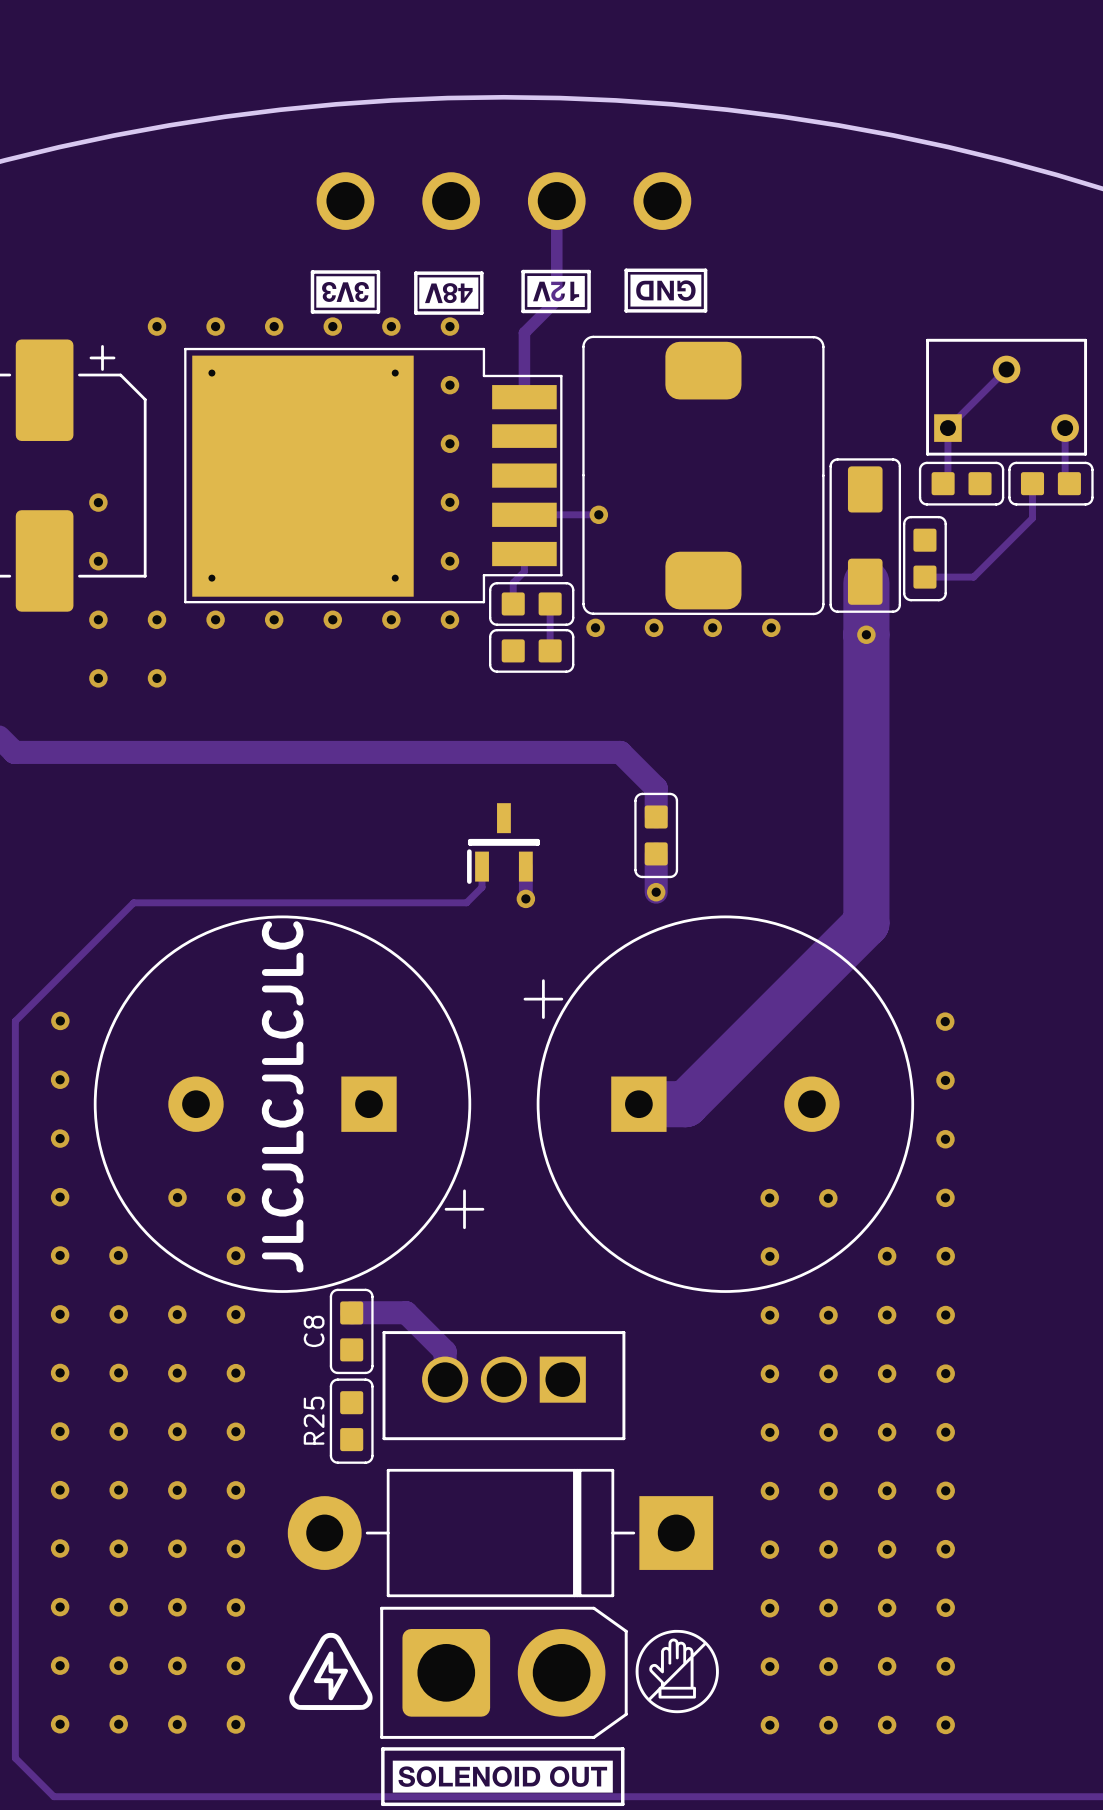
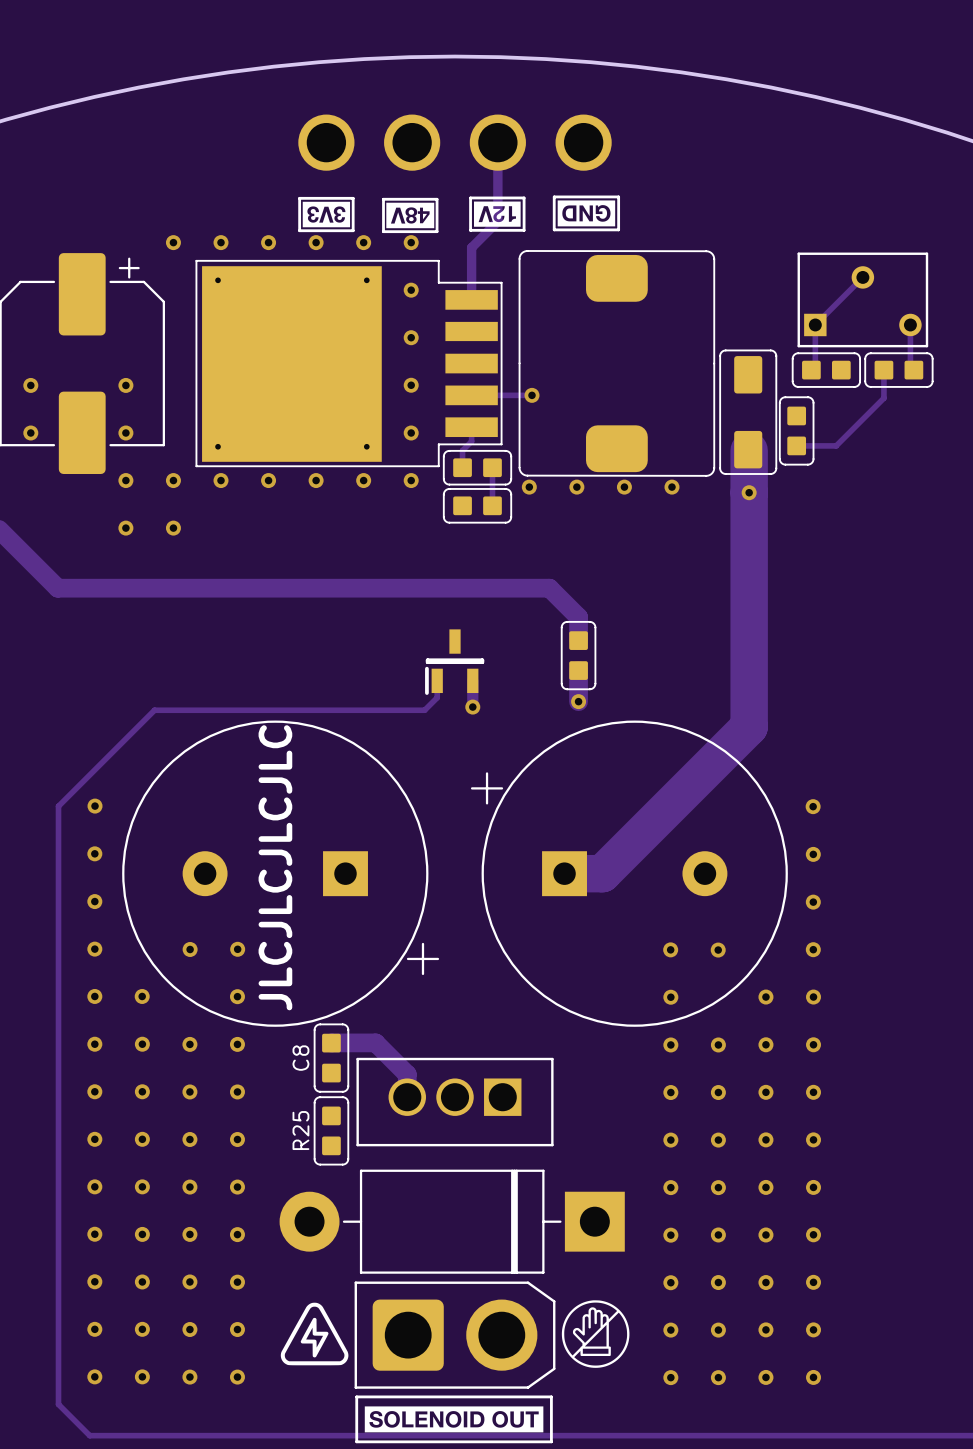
part footprint: [316, 172, 692, 230] -> [298, 114, 612, 171]

